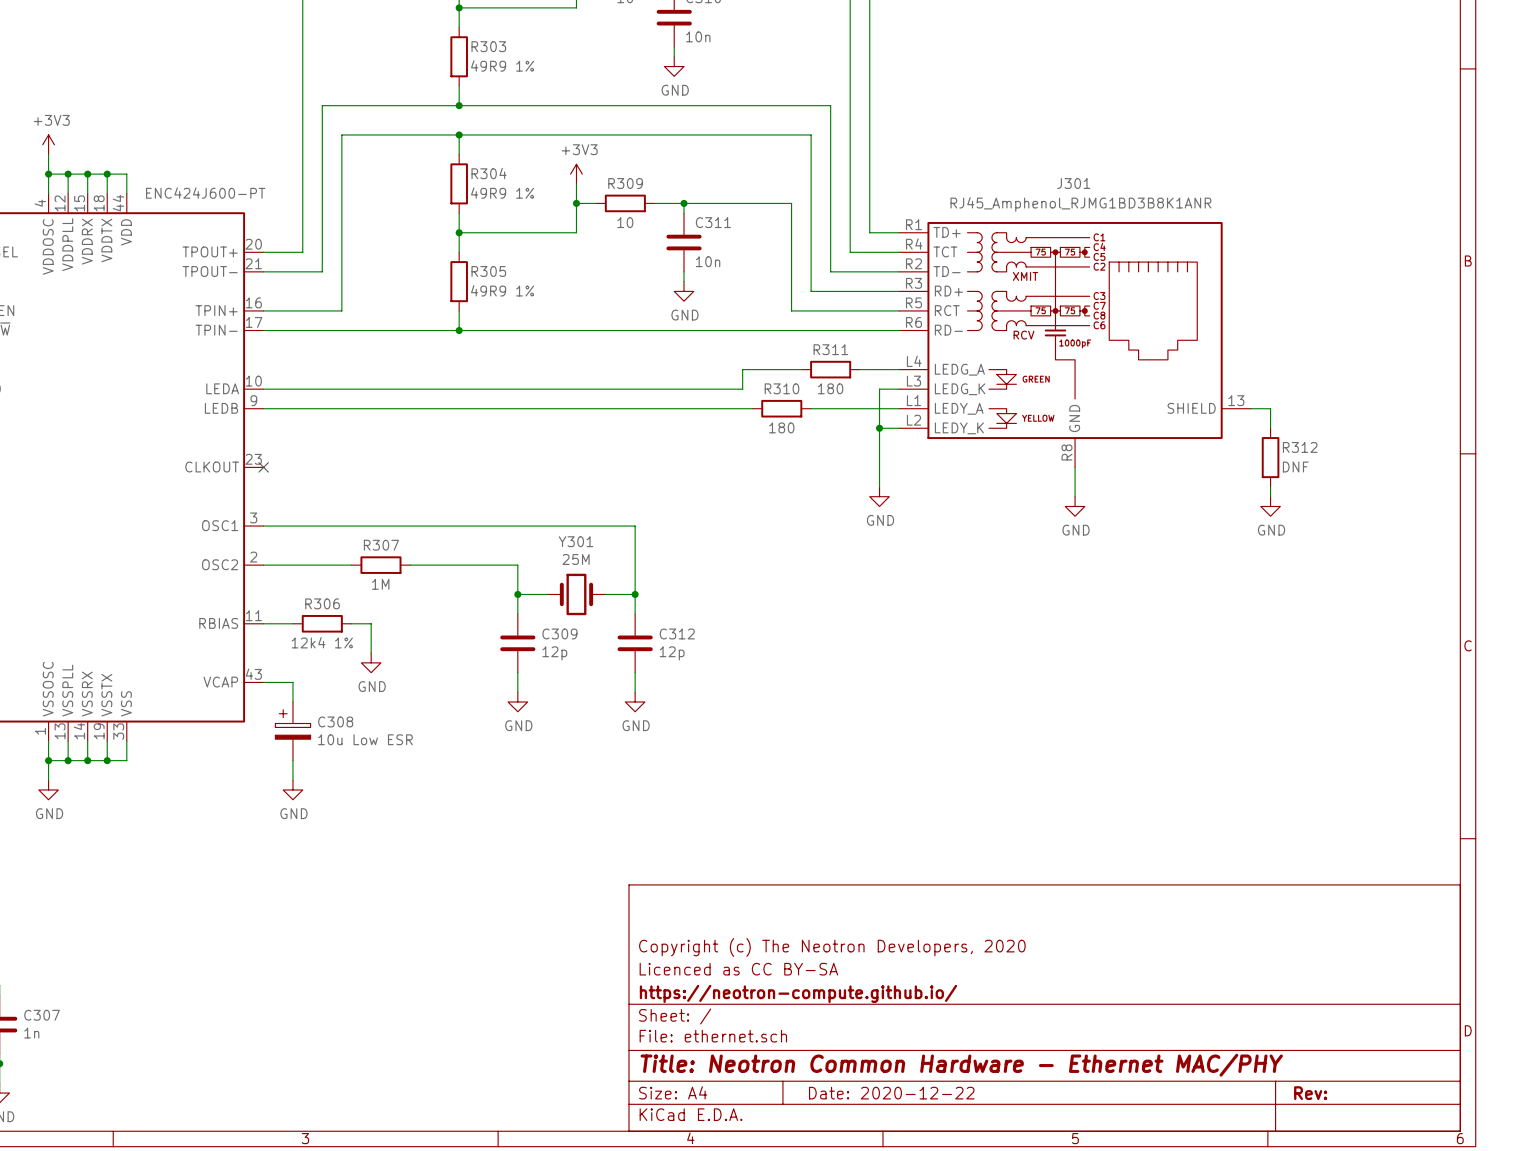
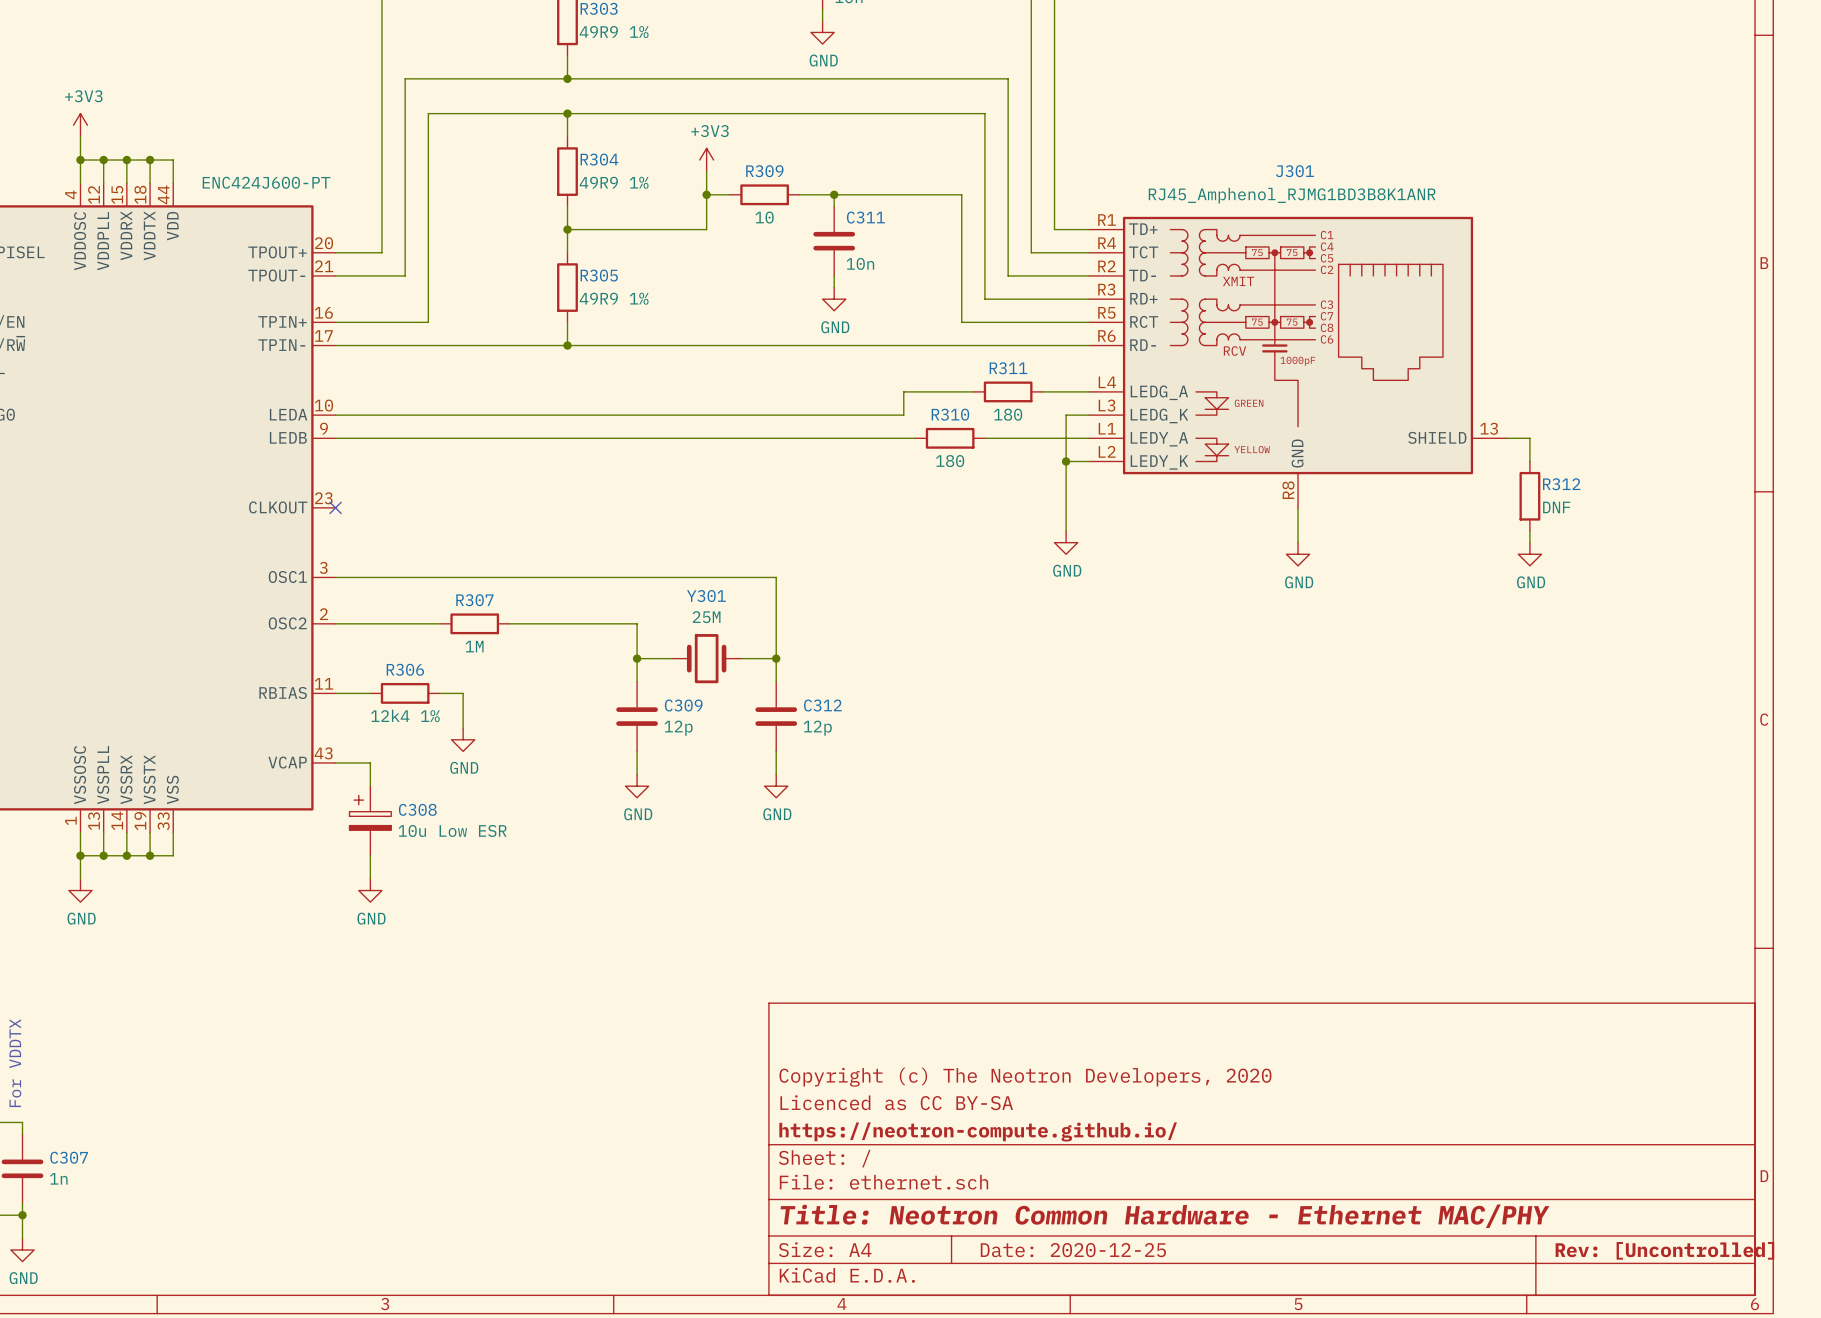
title block: Date: 2020-12-22 (891, 1093) -> Date: 2020-12-25 (1073, 1250)
title block: Rev: (1310, 1093) -> Rev: [Uncontrolled] (1664, 1250)

